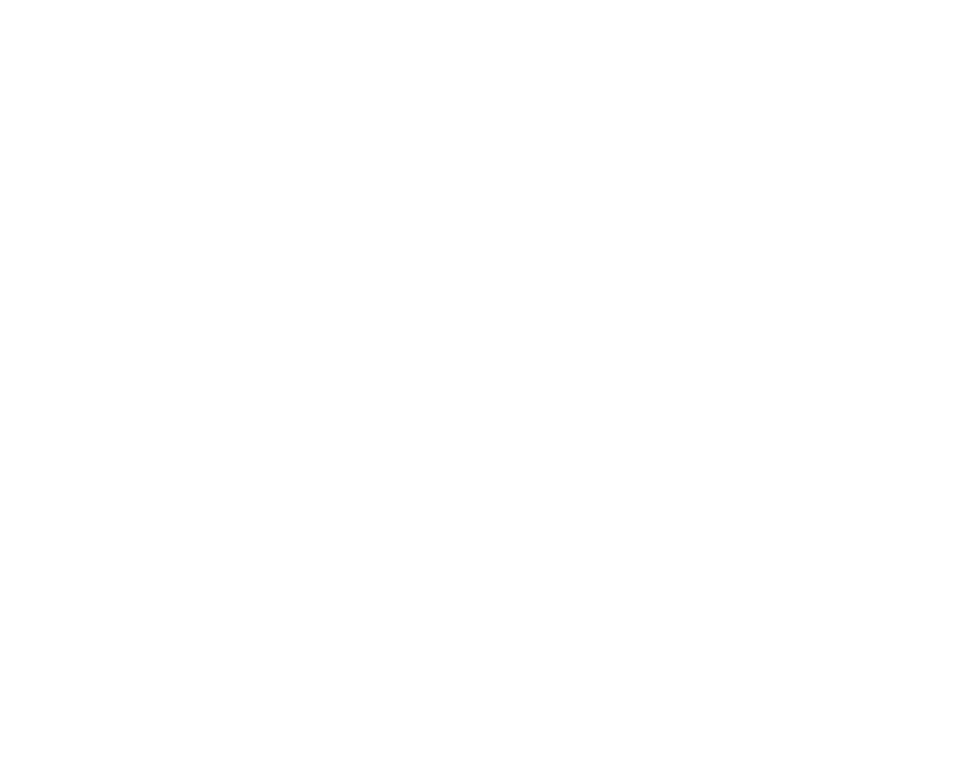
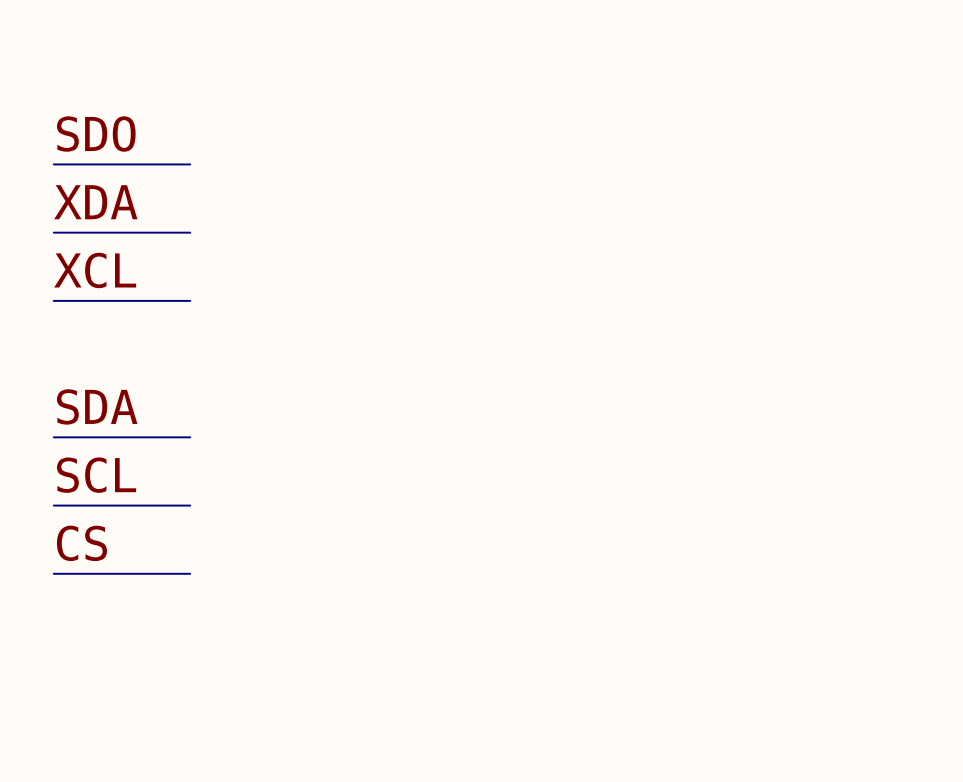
label: none -> SDO (96, 134)
wire: none -> (53, 164) (190, 164)
label: none -> XDA (95, 202)
wire: none -> (53, 232) (190, 232)
label: none -> XCL (95, 270)
wire: none -> (53, 300) (190, 300)
label: none -> SDA (97, 406)
wire: none -> (53, 437) (190, 437)
label: none -> SCL (96, 475)
wire: none -> (53, 505) (190, 505)
label: none -> CS (81, 543)
wire: none -> (53, 573) (190, 573)

